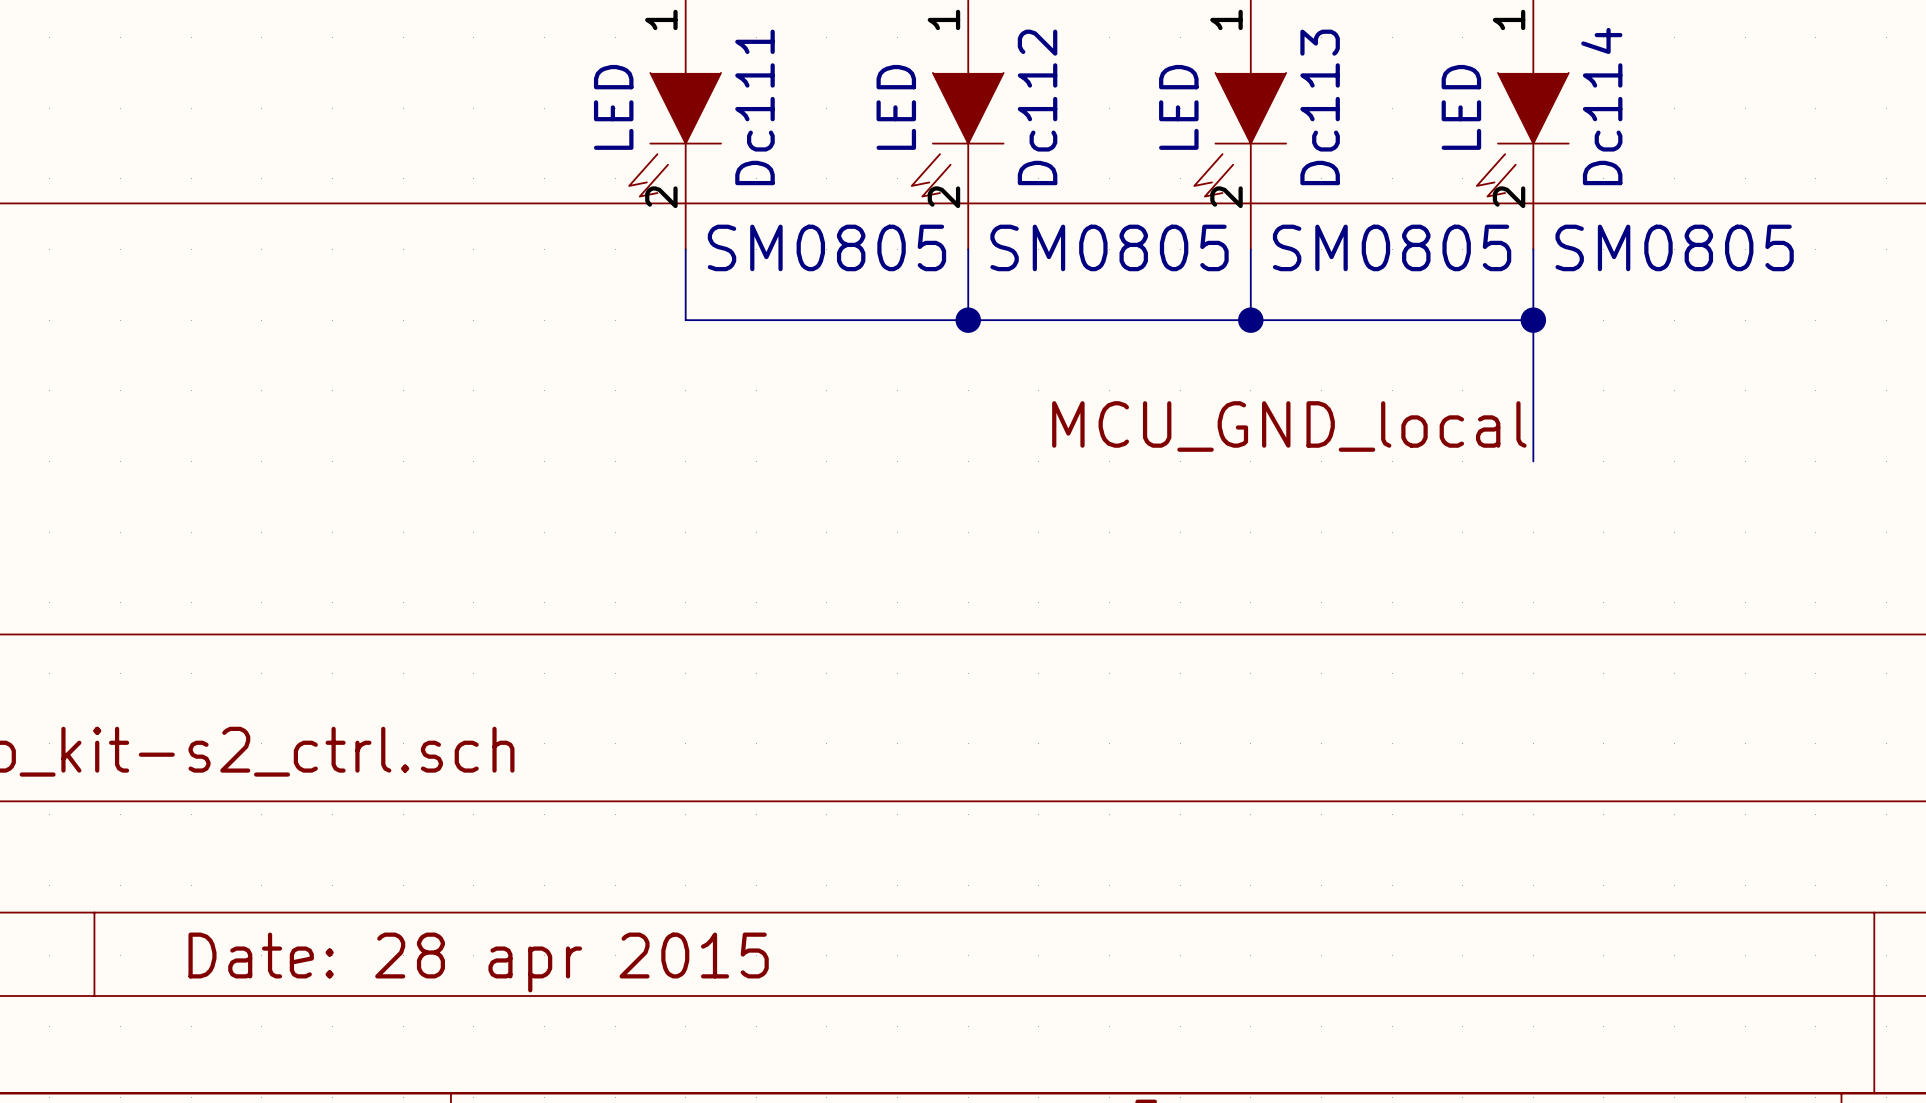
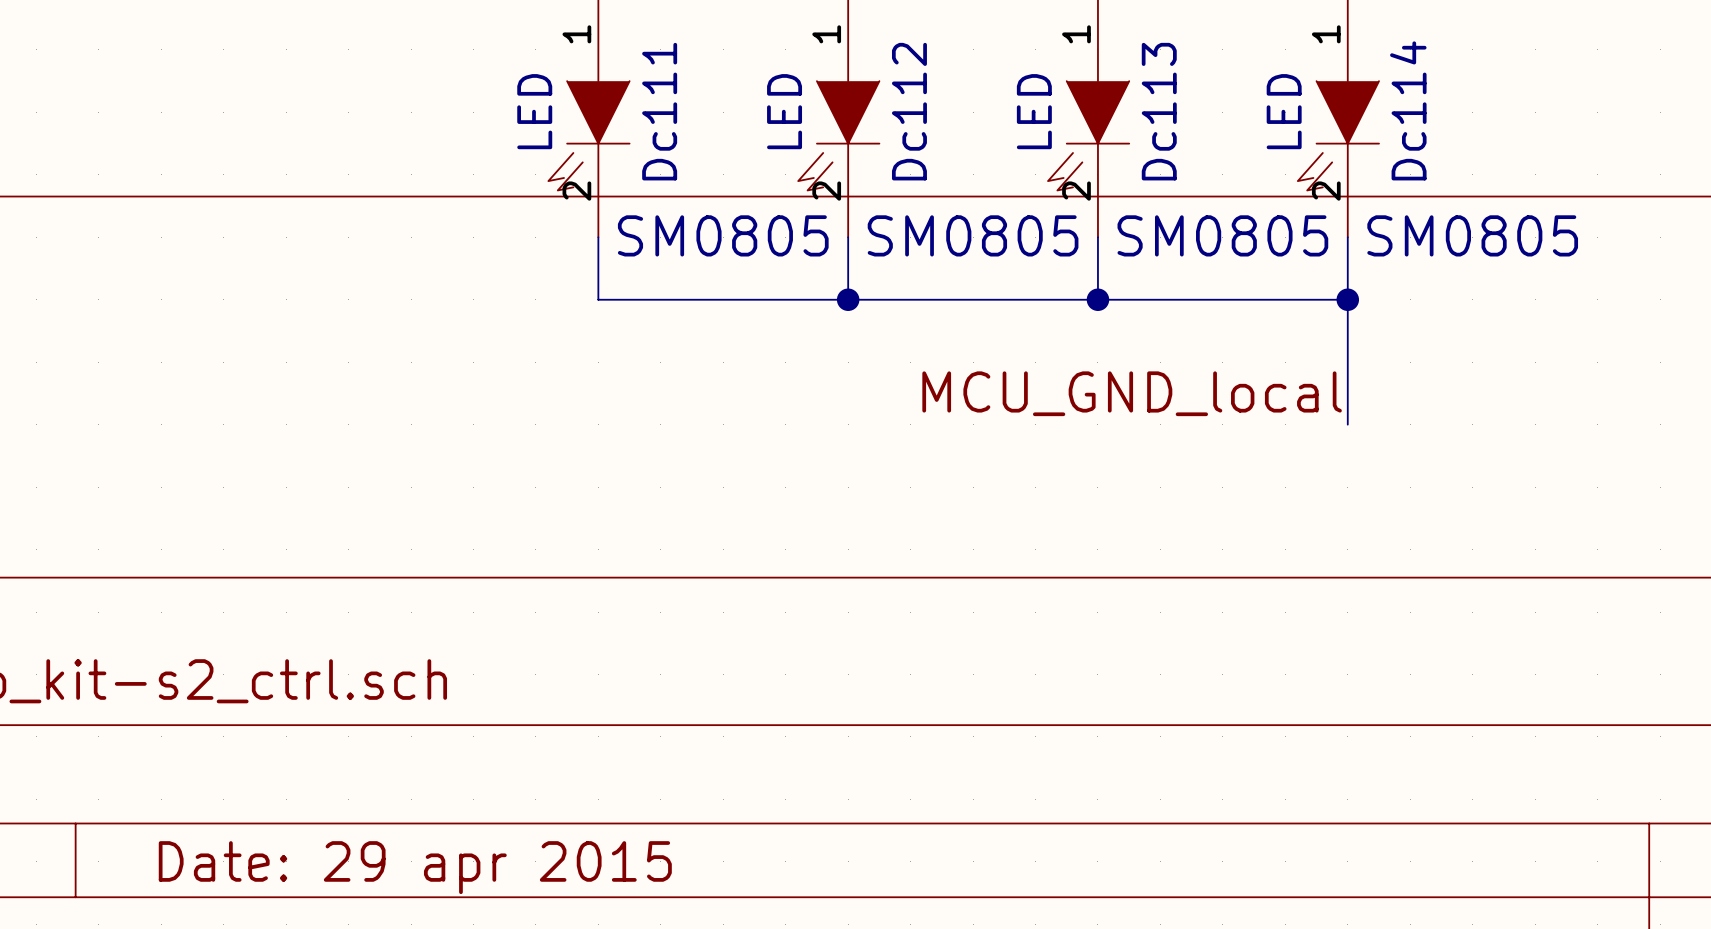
title block: Date: 28 apr 2015 (478, 962) -> Date: 29 apr 2015 (415, 867)

